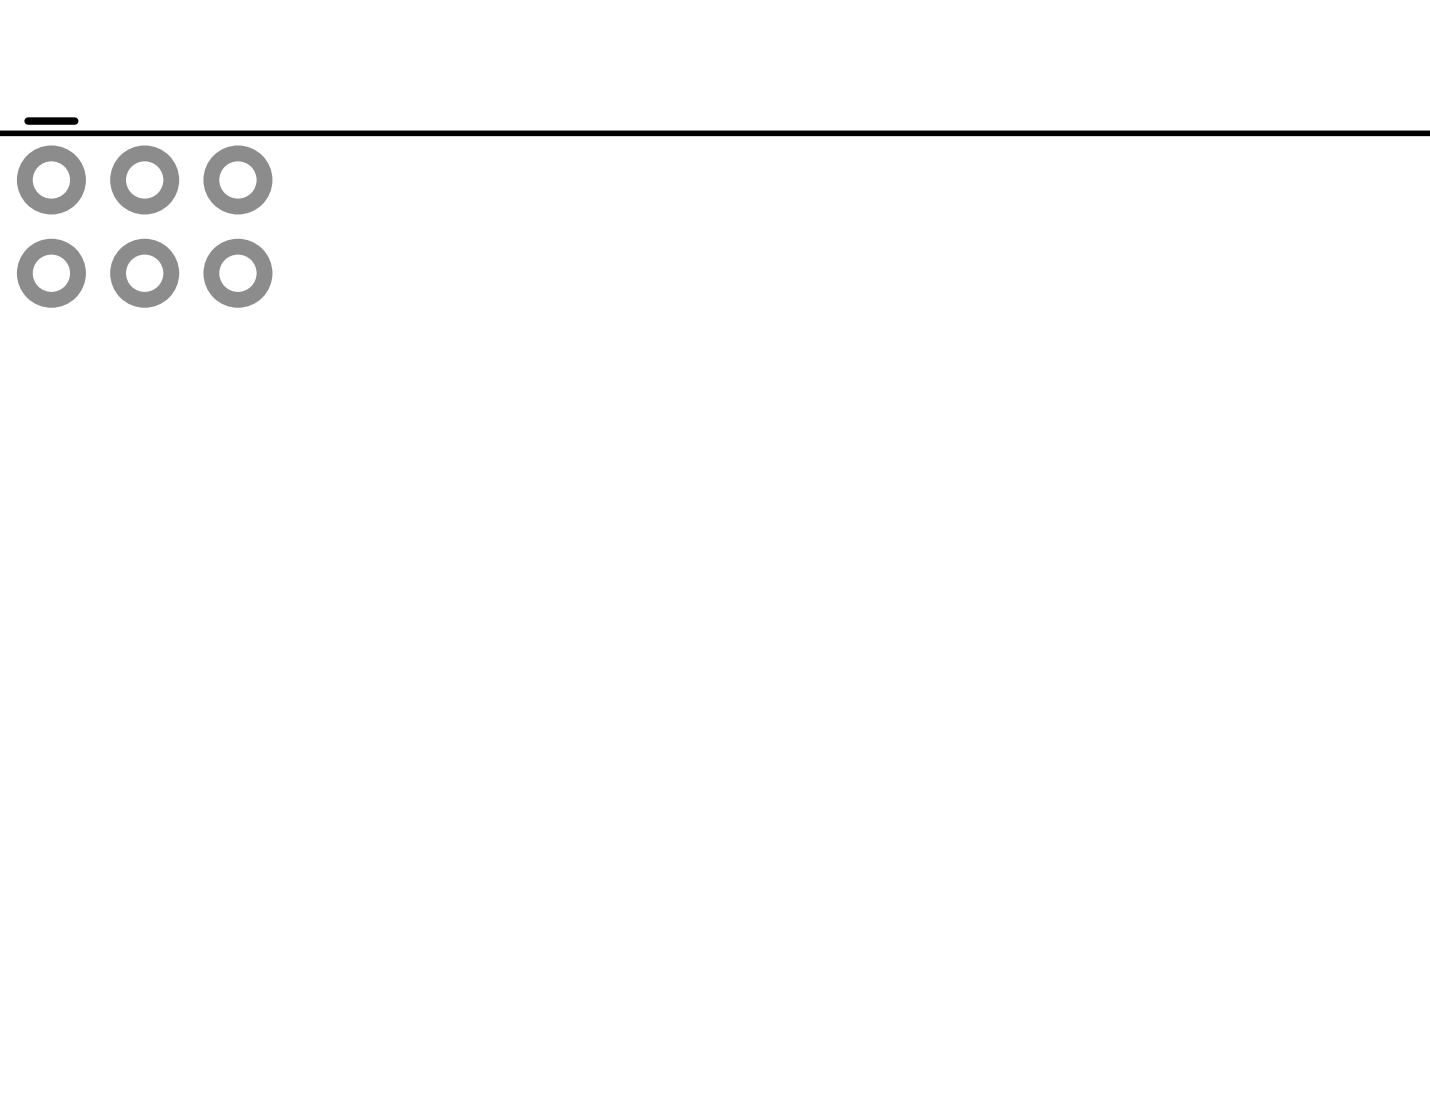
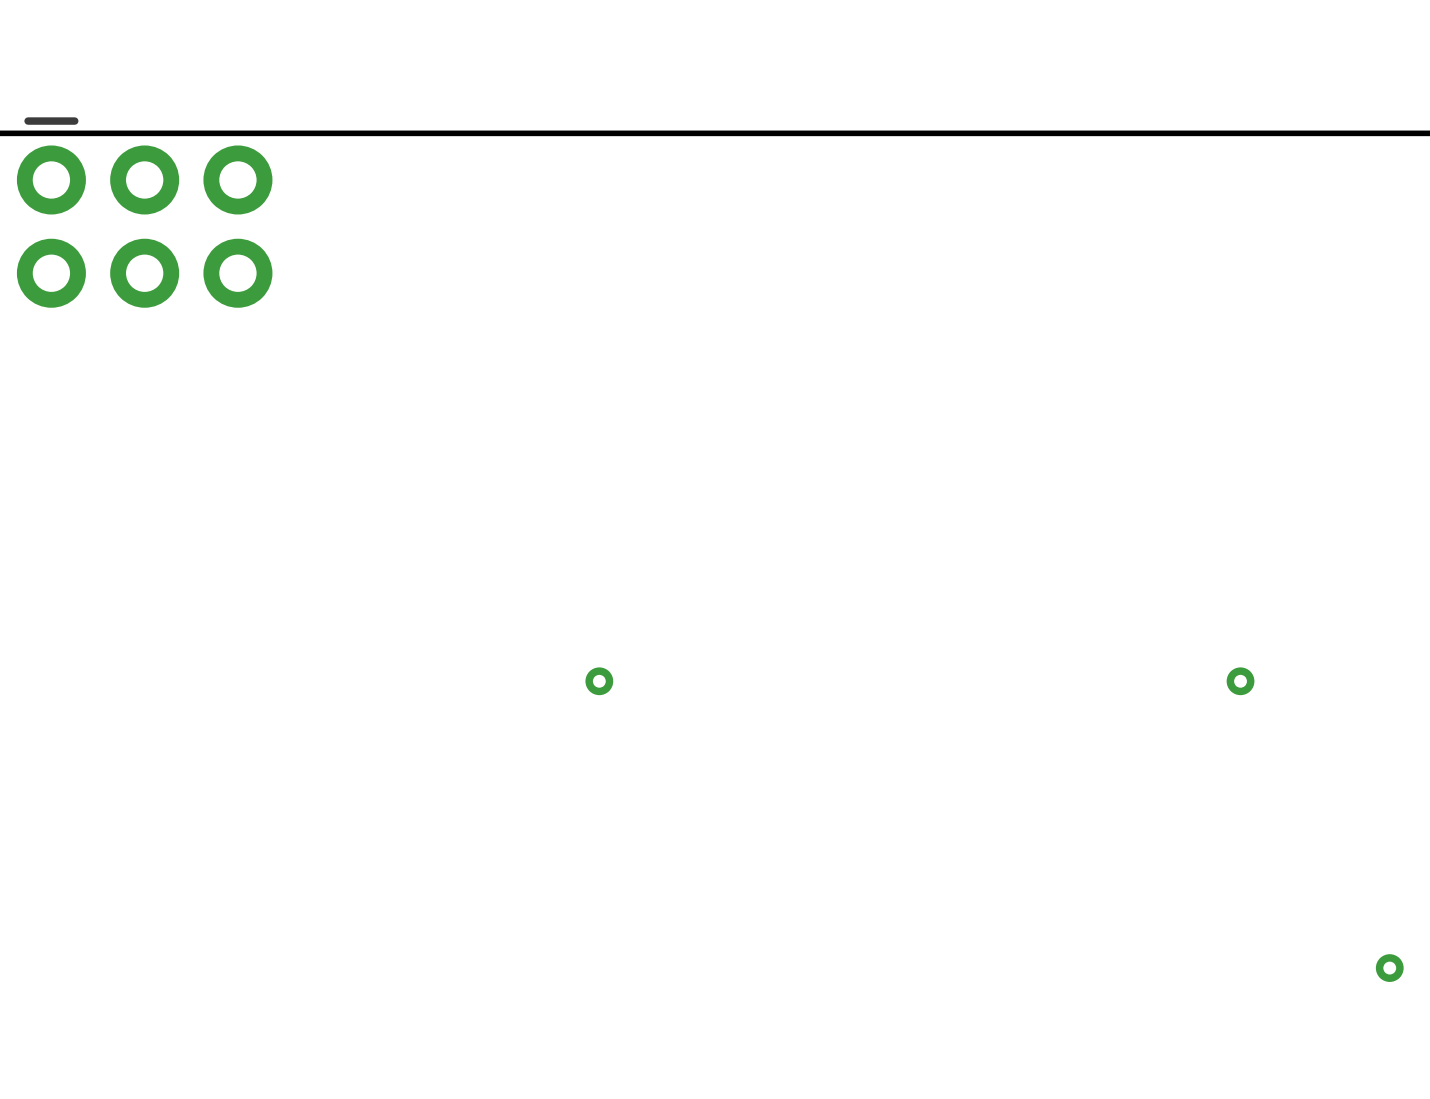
via: none -> (599, 681)
via: none -> (1240, 681)
via: none -> (1389, 968)

